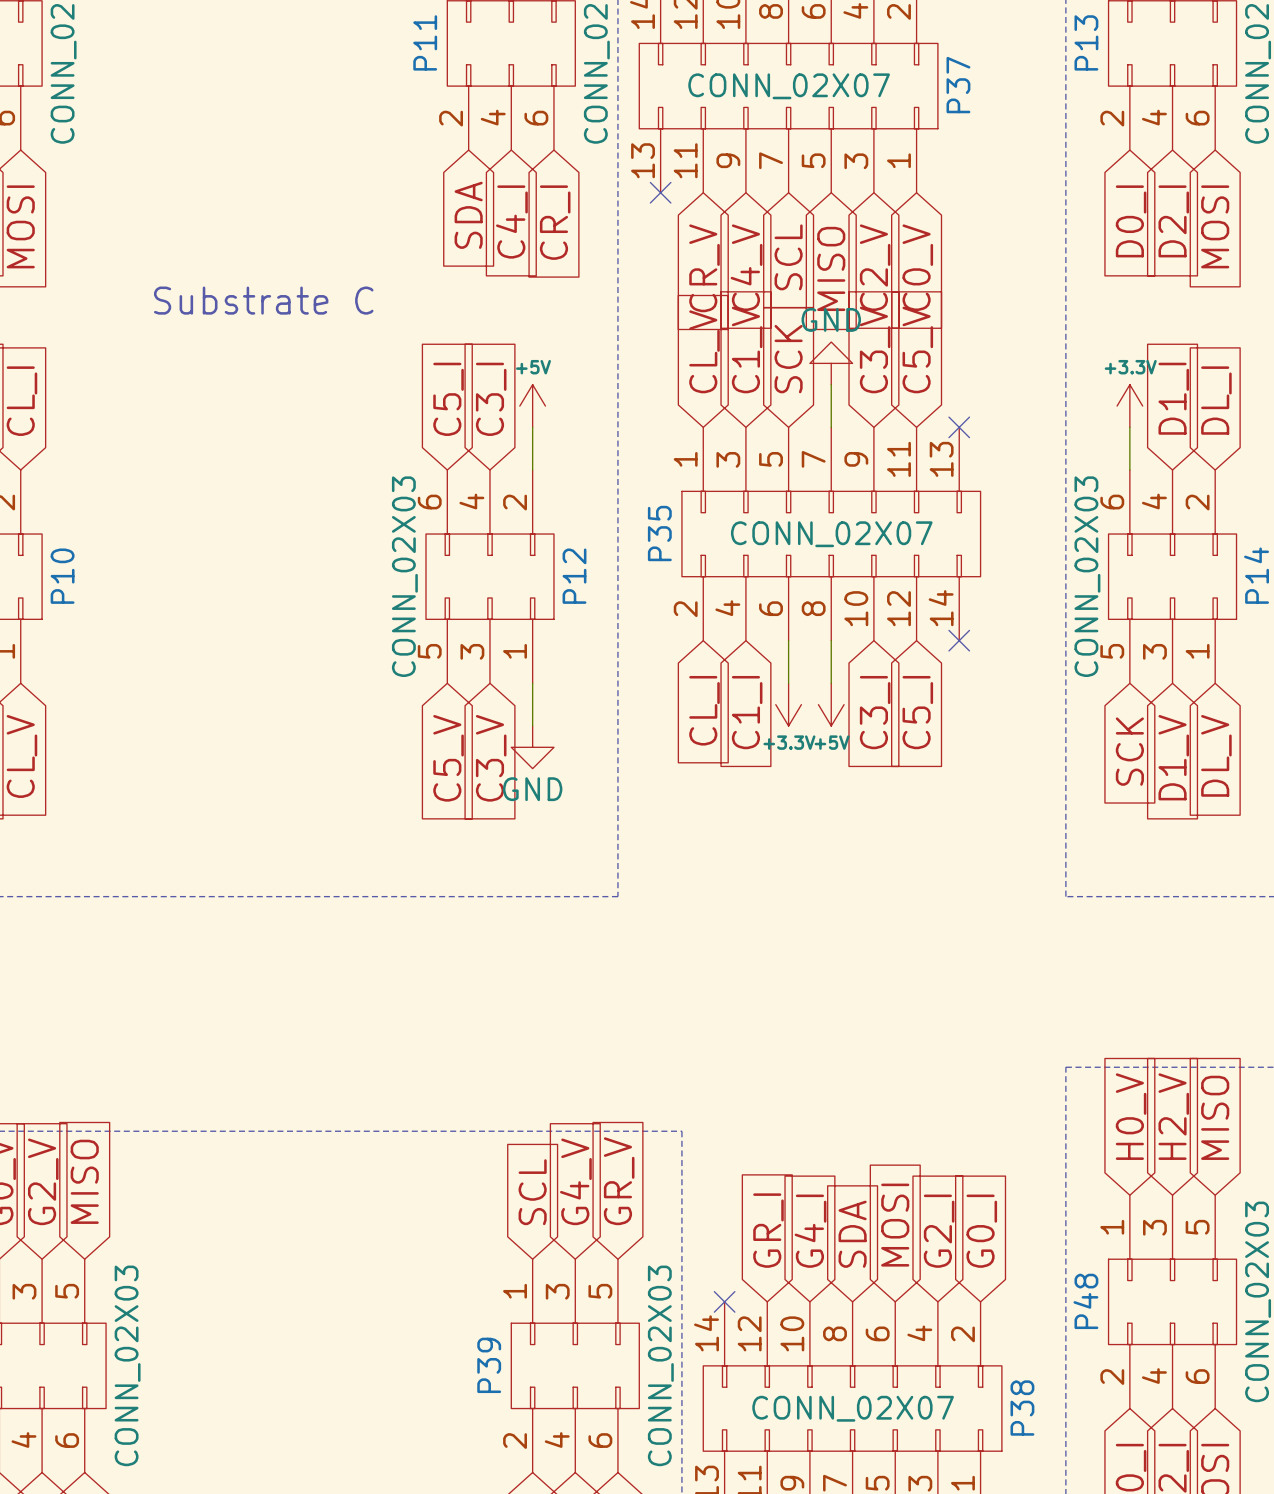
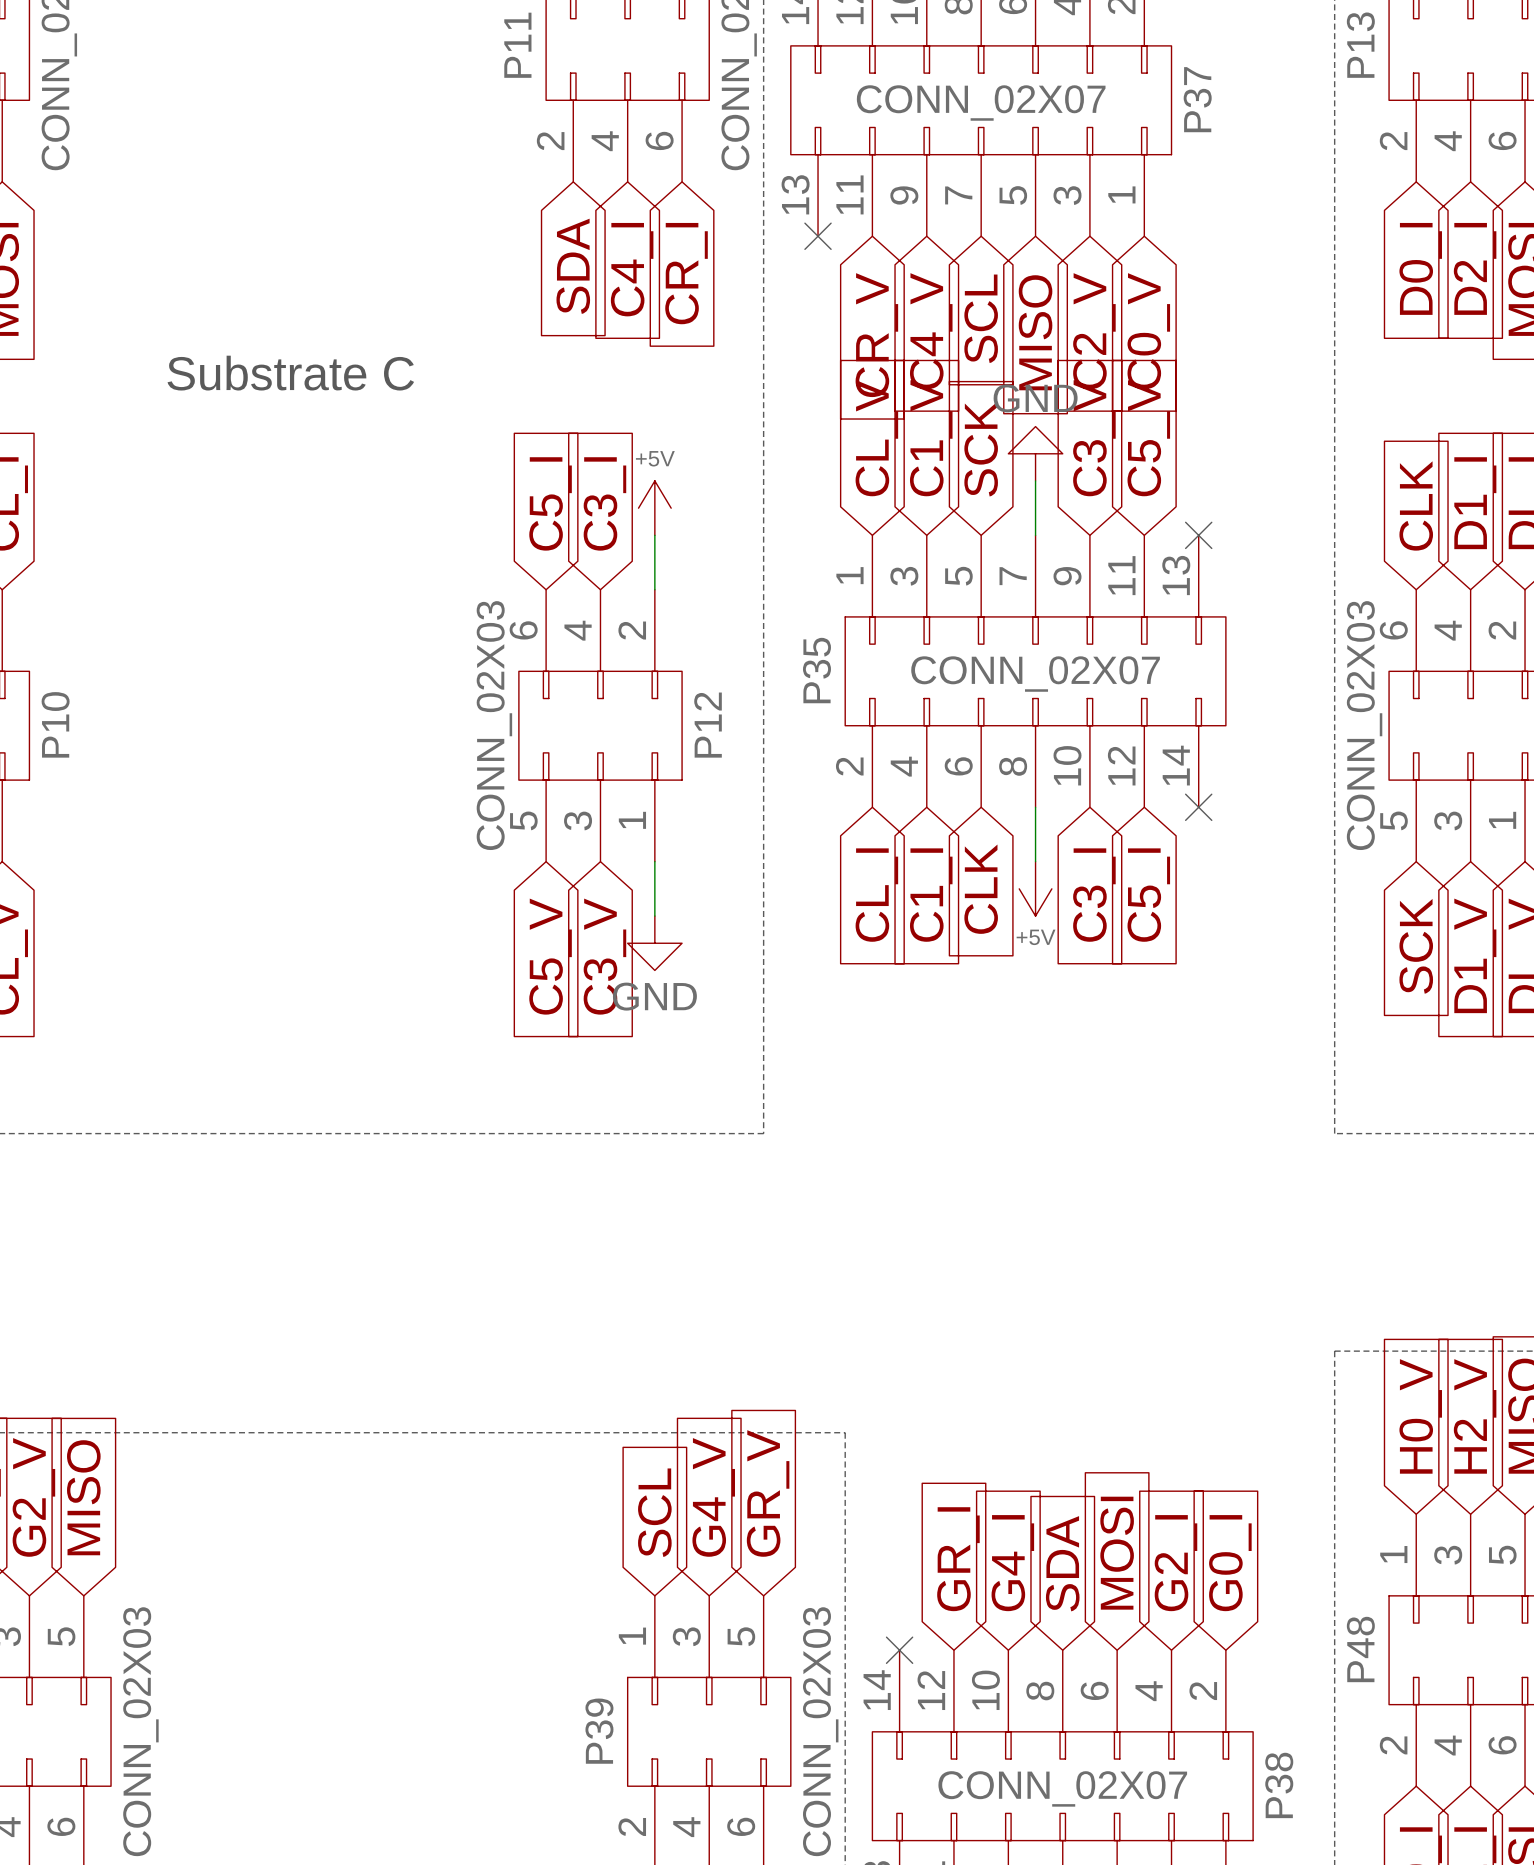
global label: none -> CLK (1416, 505)
power symbol: +3.3V (1129, 406) -> none
wire: (1129, 427) (1129, 470) -> none
wire: (788, 640) (788, 683) -> none
power symbol: +3.3V (788, 704) -> none
global label: none -> CLK (981, 889)

